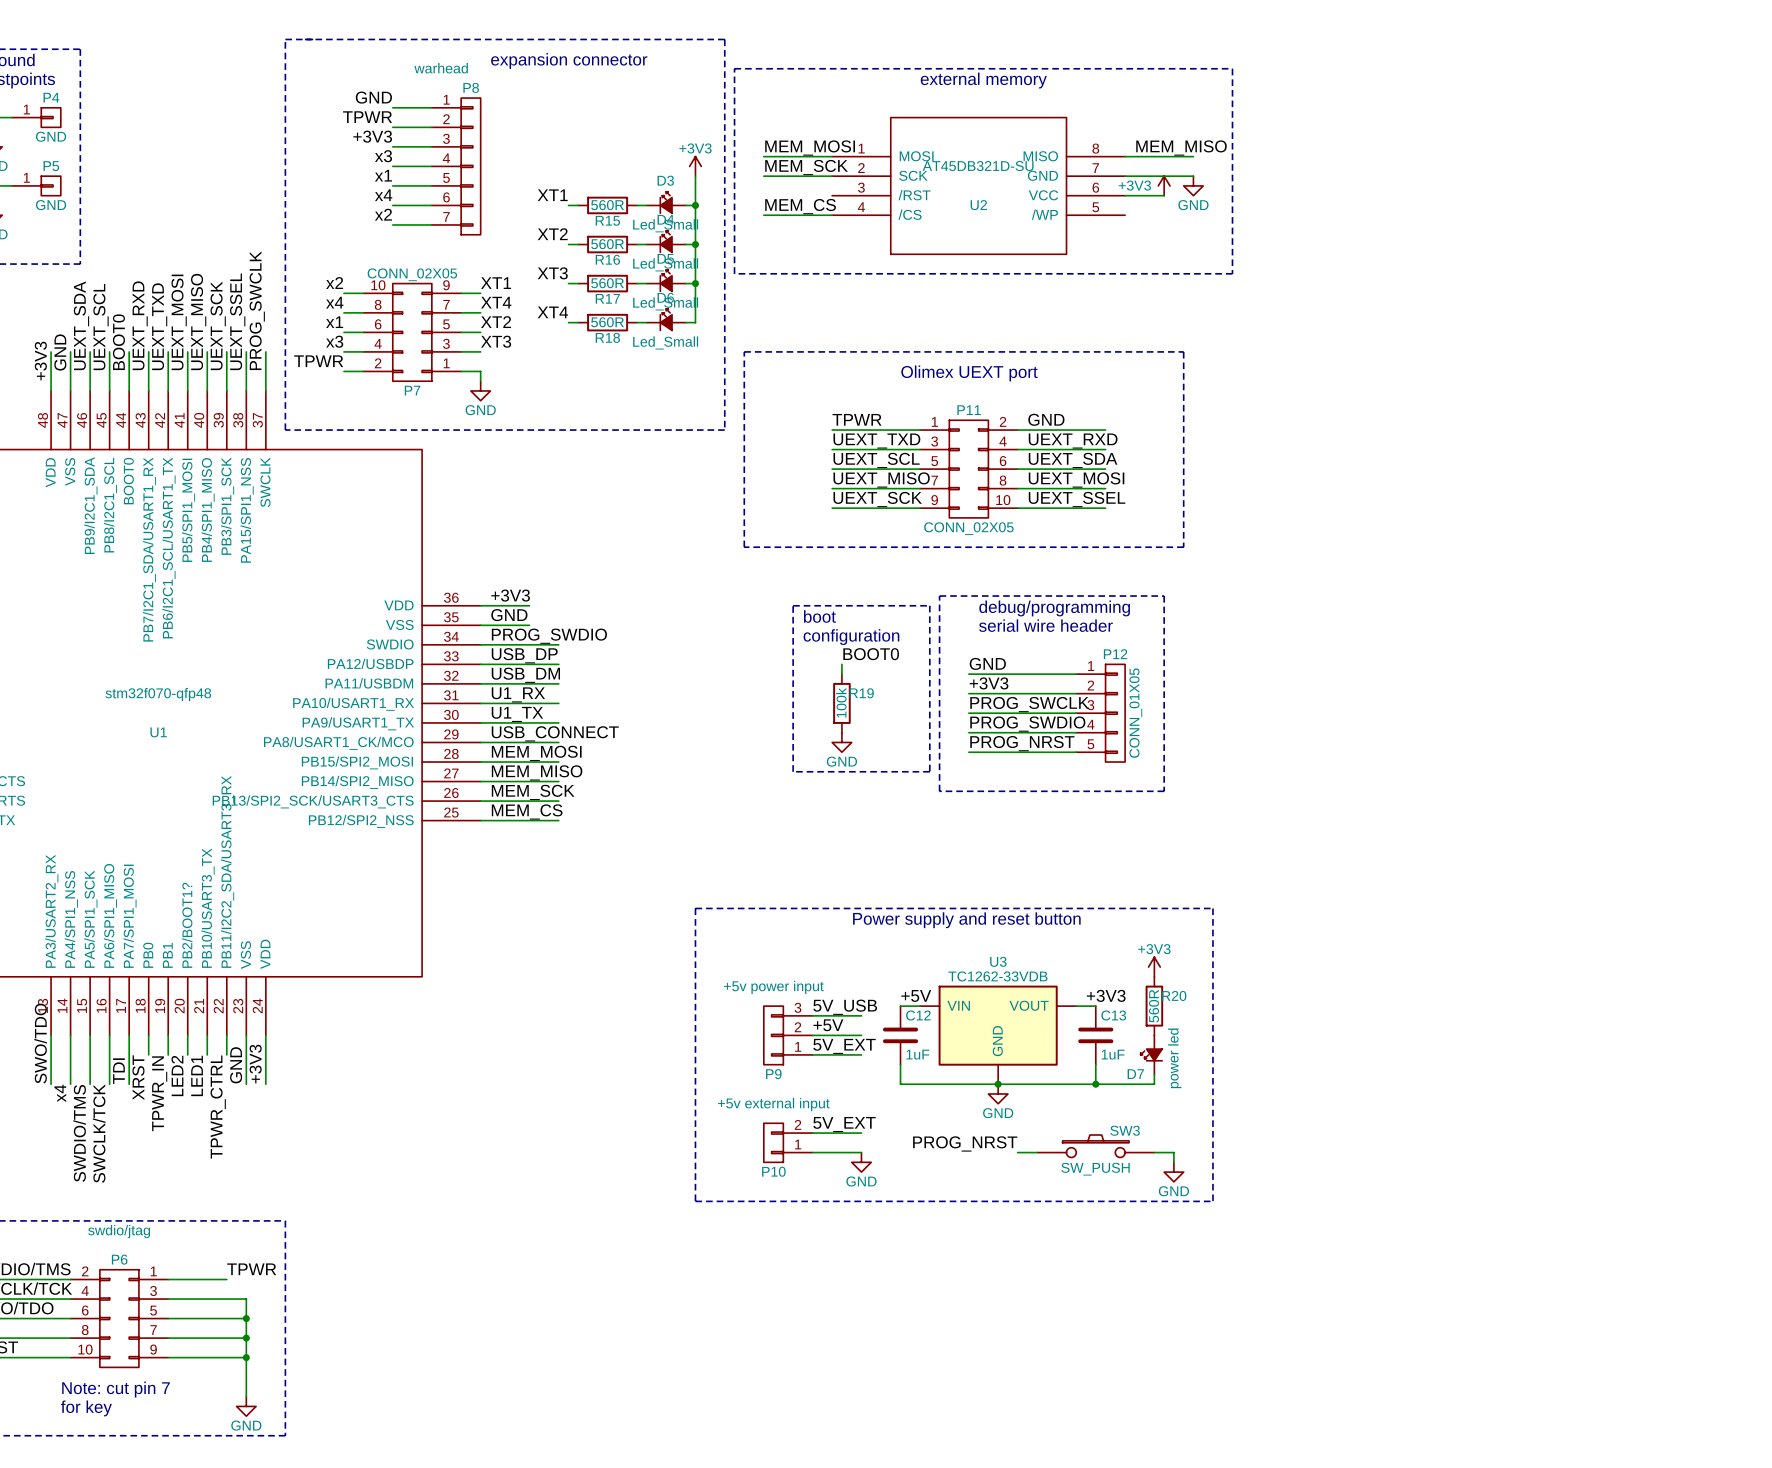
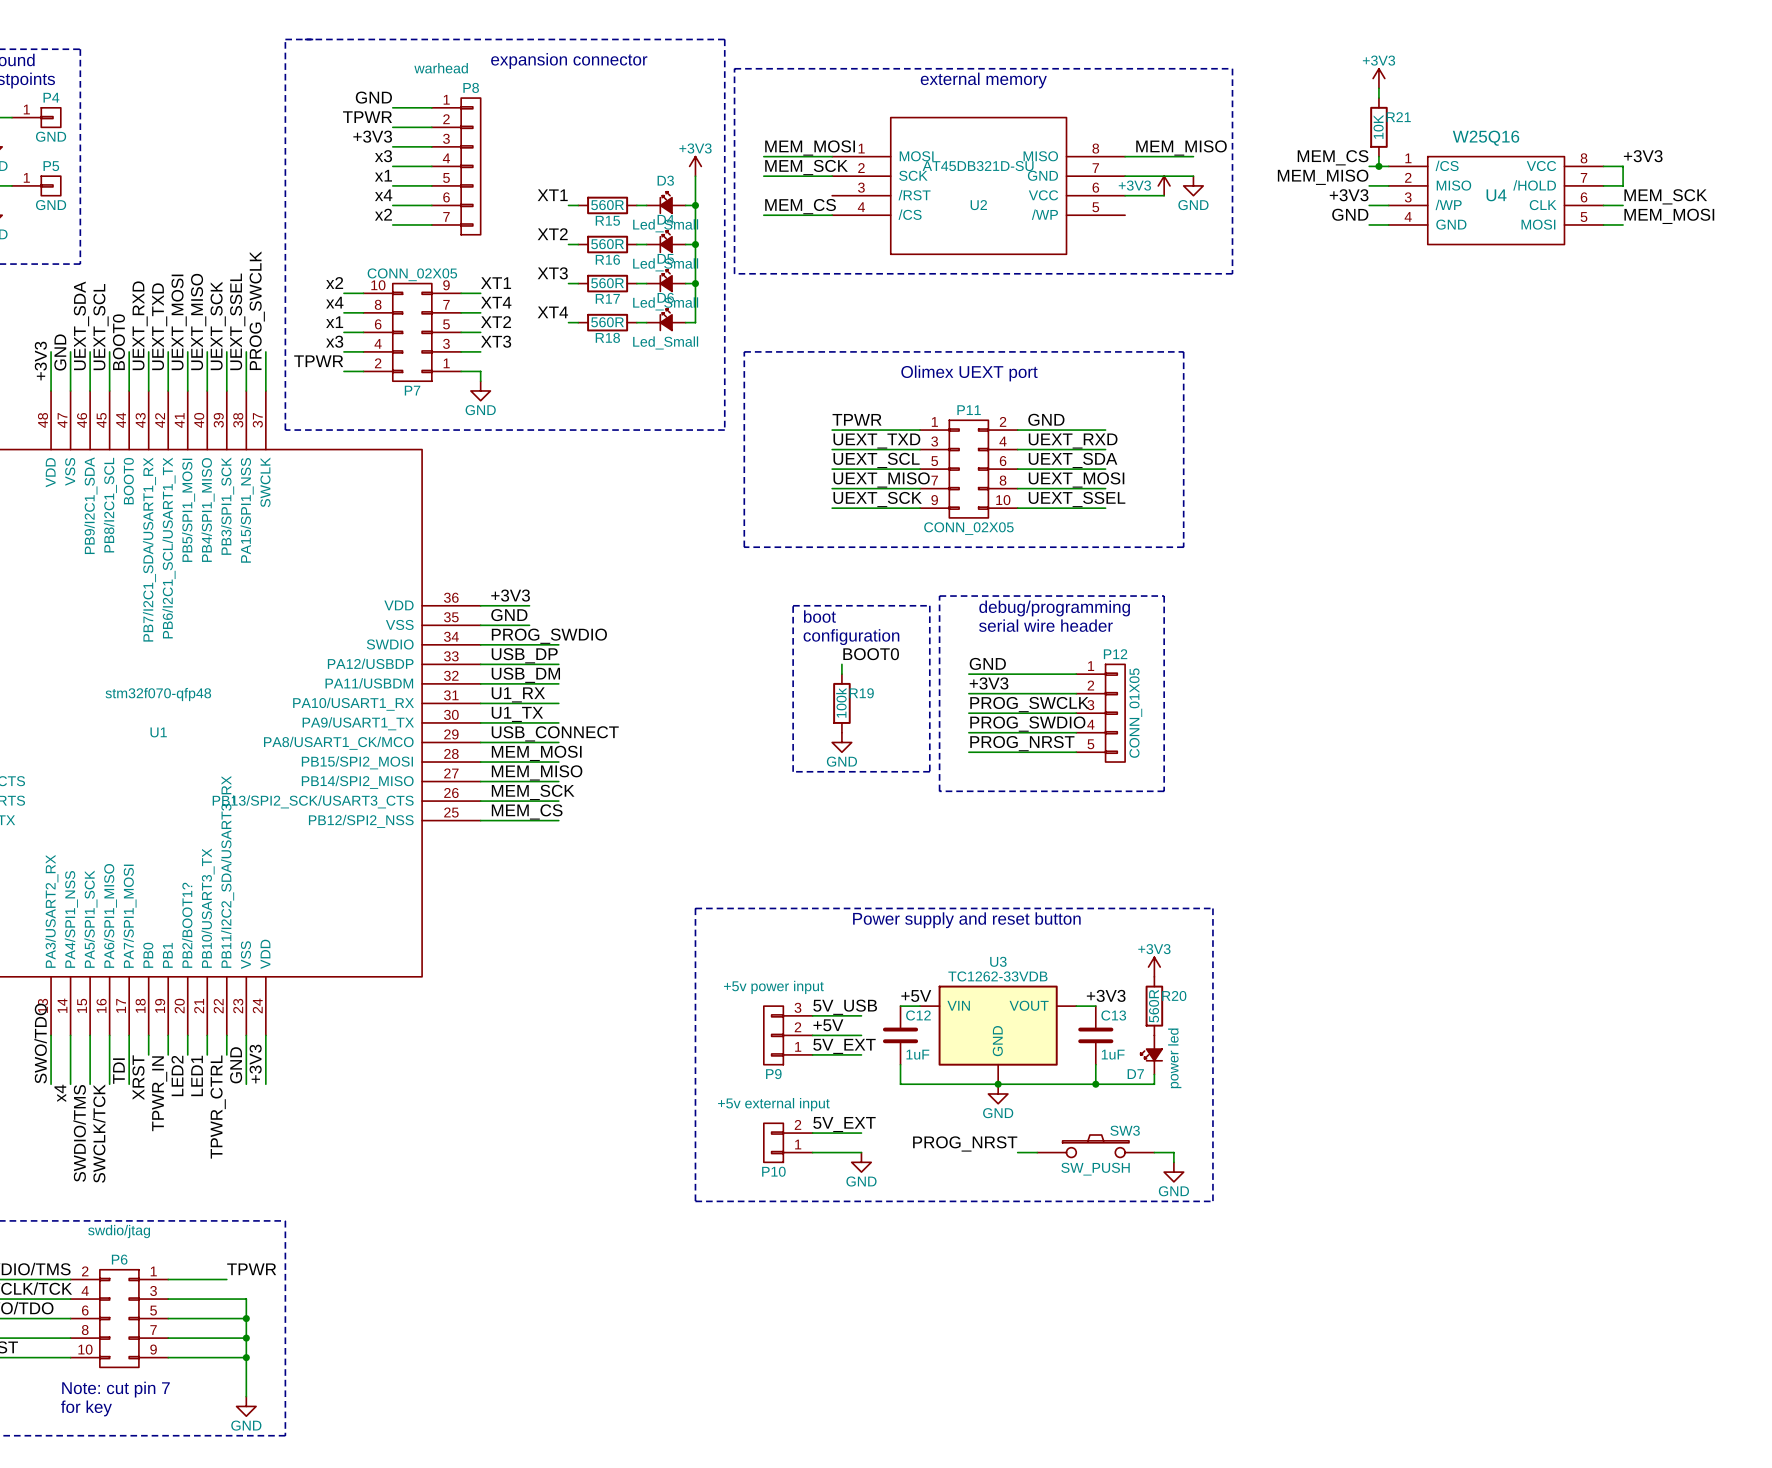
power symbol: none -> +3V3 (1378, 78)
wire: none -> (1378, 88) (1378, 98)
R21: none -> 10K (1378, 127)
wire: none -> (1378, 156) (1378, 166)
label: none -> +3V3 (1643, 156)
label: none -> MEM_CS (1333, 157)
wire: none -> (1369, 166) (1388, 166)
junction: none -> (1378, 166)
wire: none -> (1603, 166) (1623, 166) (1623, 185) (1603, 185)
label: none -> MEM_MISO (1323, 177)
wire: none -> (1369, 185) (1388, 185)
label: none -> +3V3 (1349, 195)
label: none -> MEM_SCK (1665, 196)
U4: none -> W25Q16 (1496, 200)
wire: none -> (1369, 205) (1388, 205)
wire: none -> (1603, 205) (1623, 205)
label: none -> GND (1350, 214)
label: none -> MEM_MOSI (1669, 216)
wire: none -> (1369, 224) (1388, 224)
wire: none -> (1603, 224) (1623, 224)

